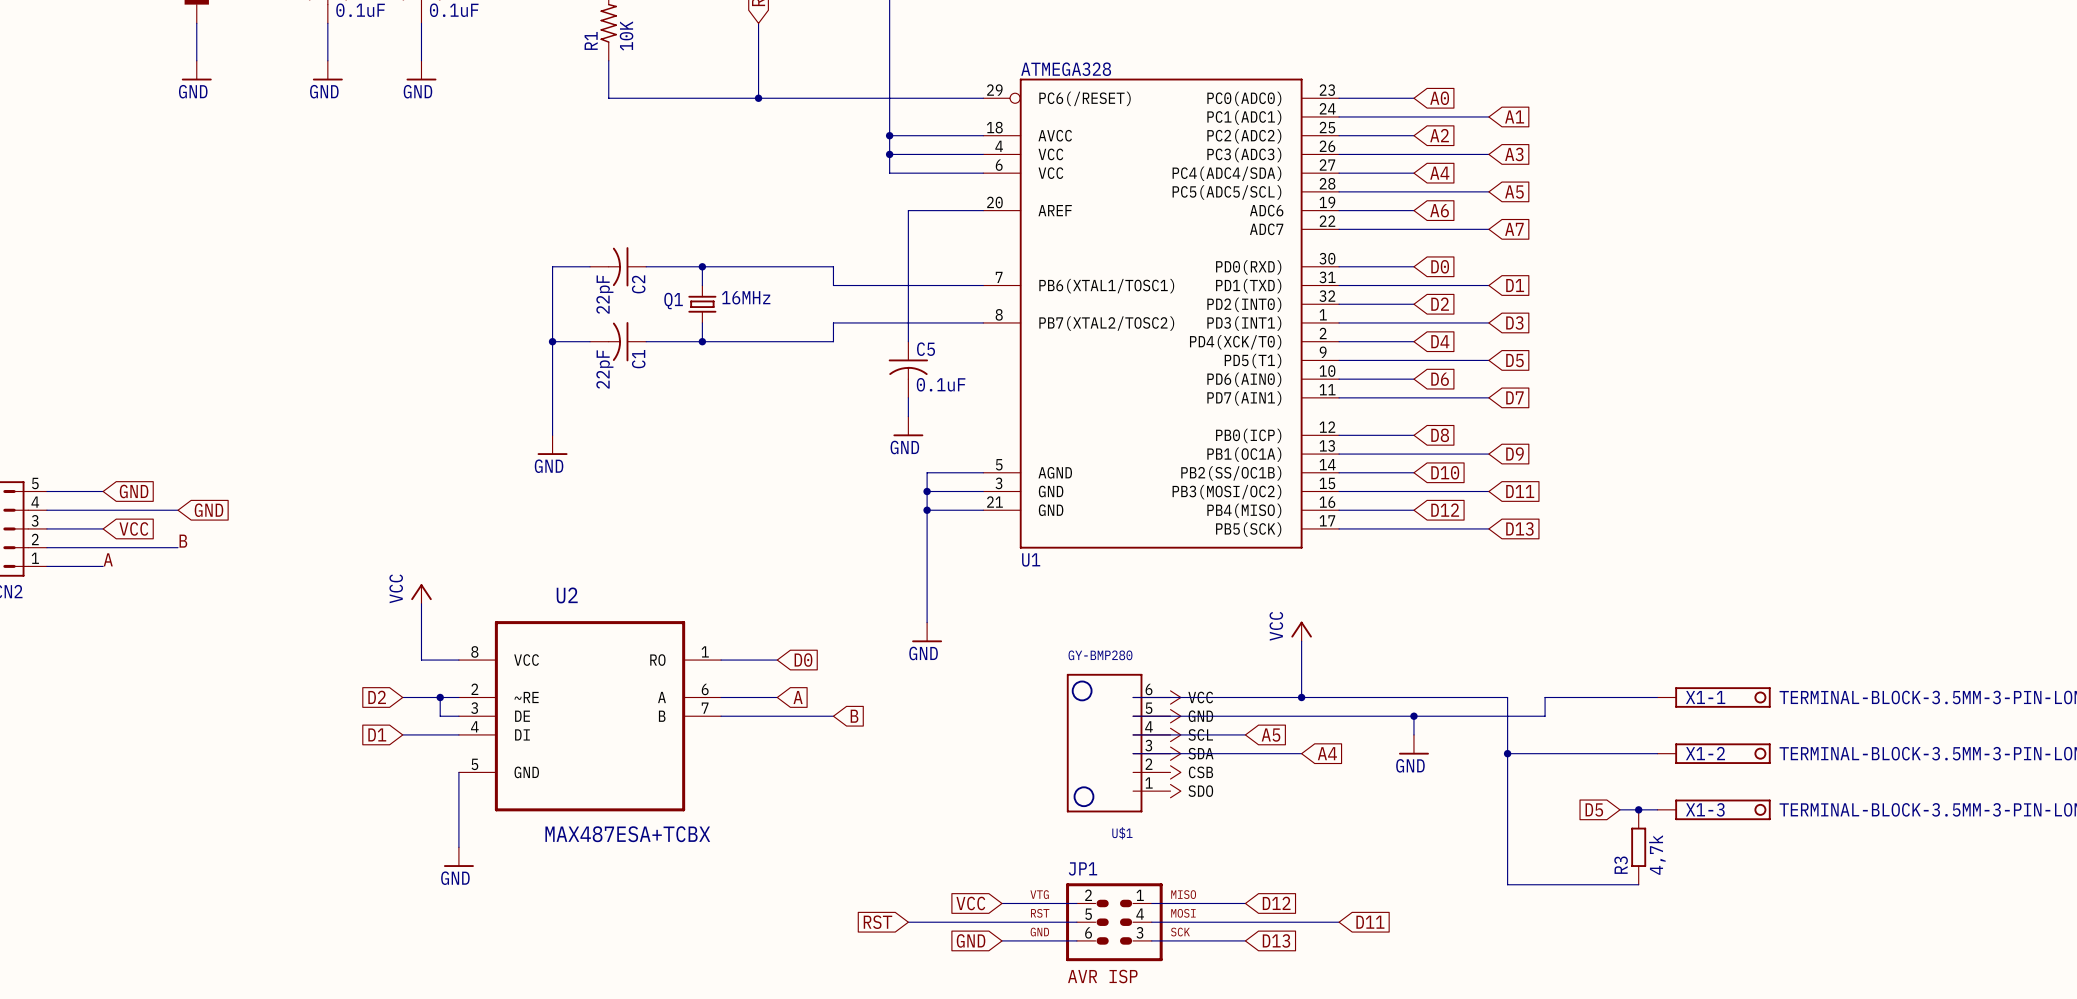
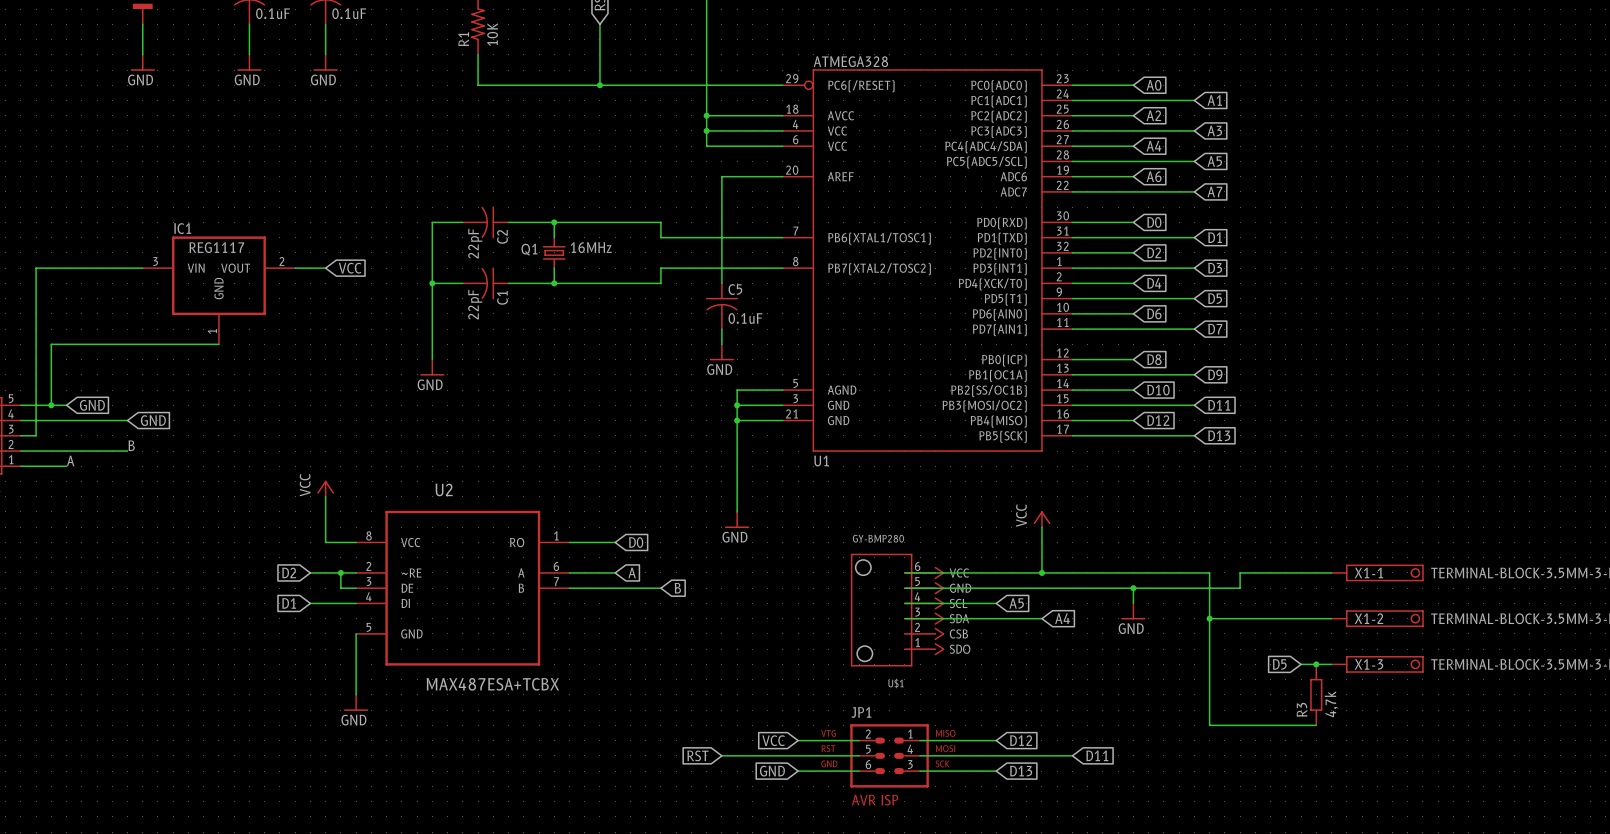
wire: none -> (295, 268) (325, 268)
global label: none -> VCC (350, 268)
IC1: none -> REG1117 (218, 290)
wire: none -> (218, 344) (51, 344) (51, 405)
junction: none -> (51, 405)
wire: (65, 528) (103, 528) -> (36, 435) (36, 268) (142, 268)
global label: VCC (133, 528) -> none

